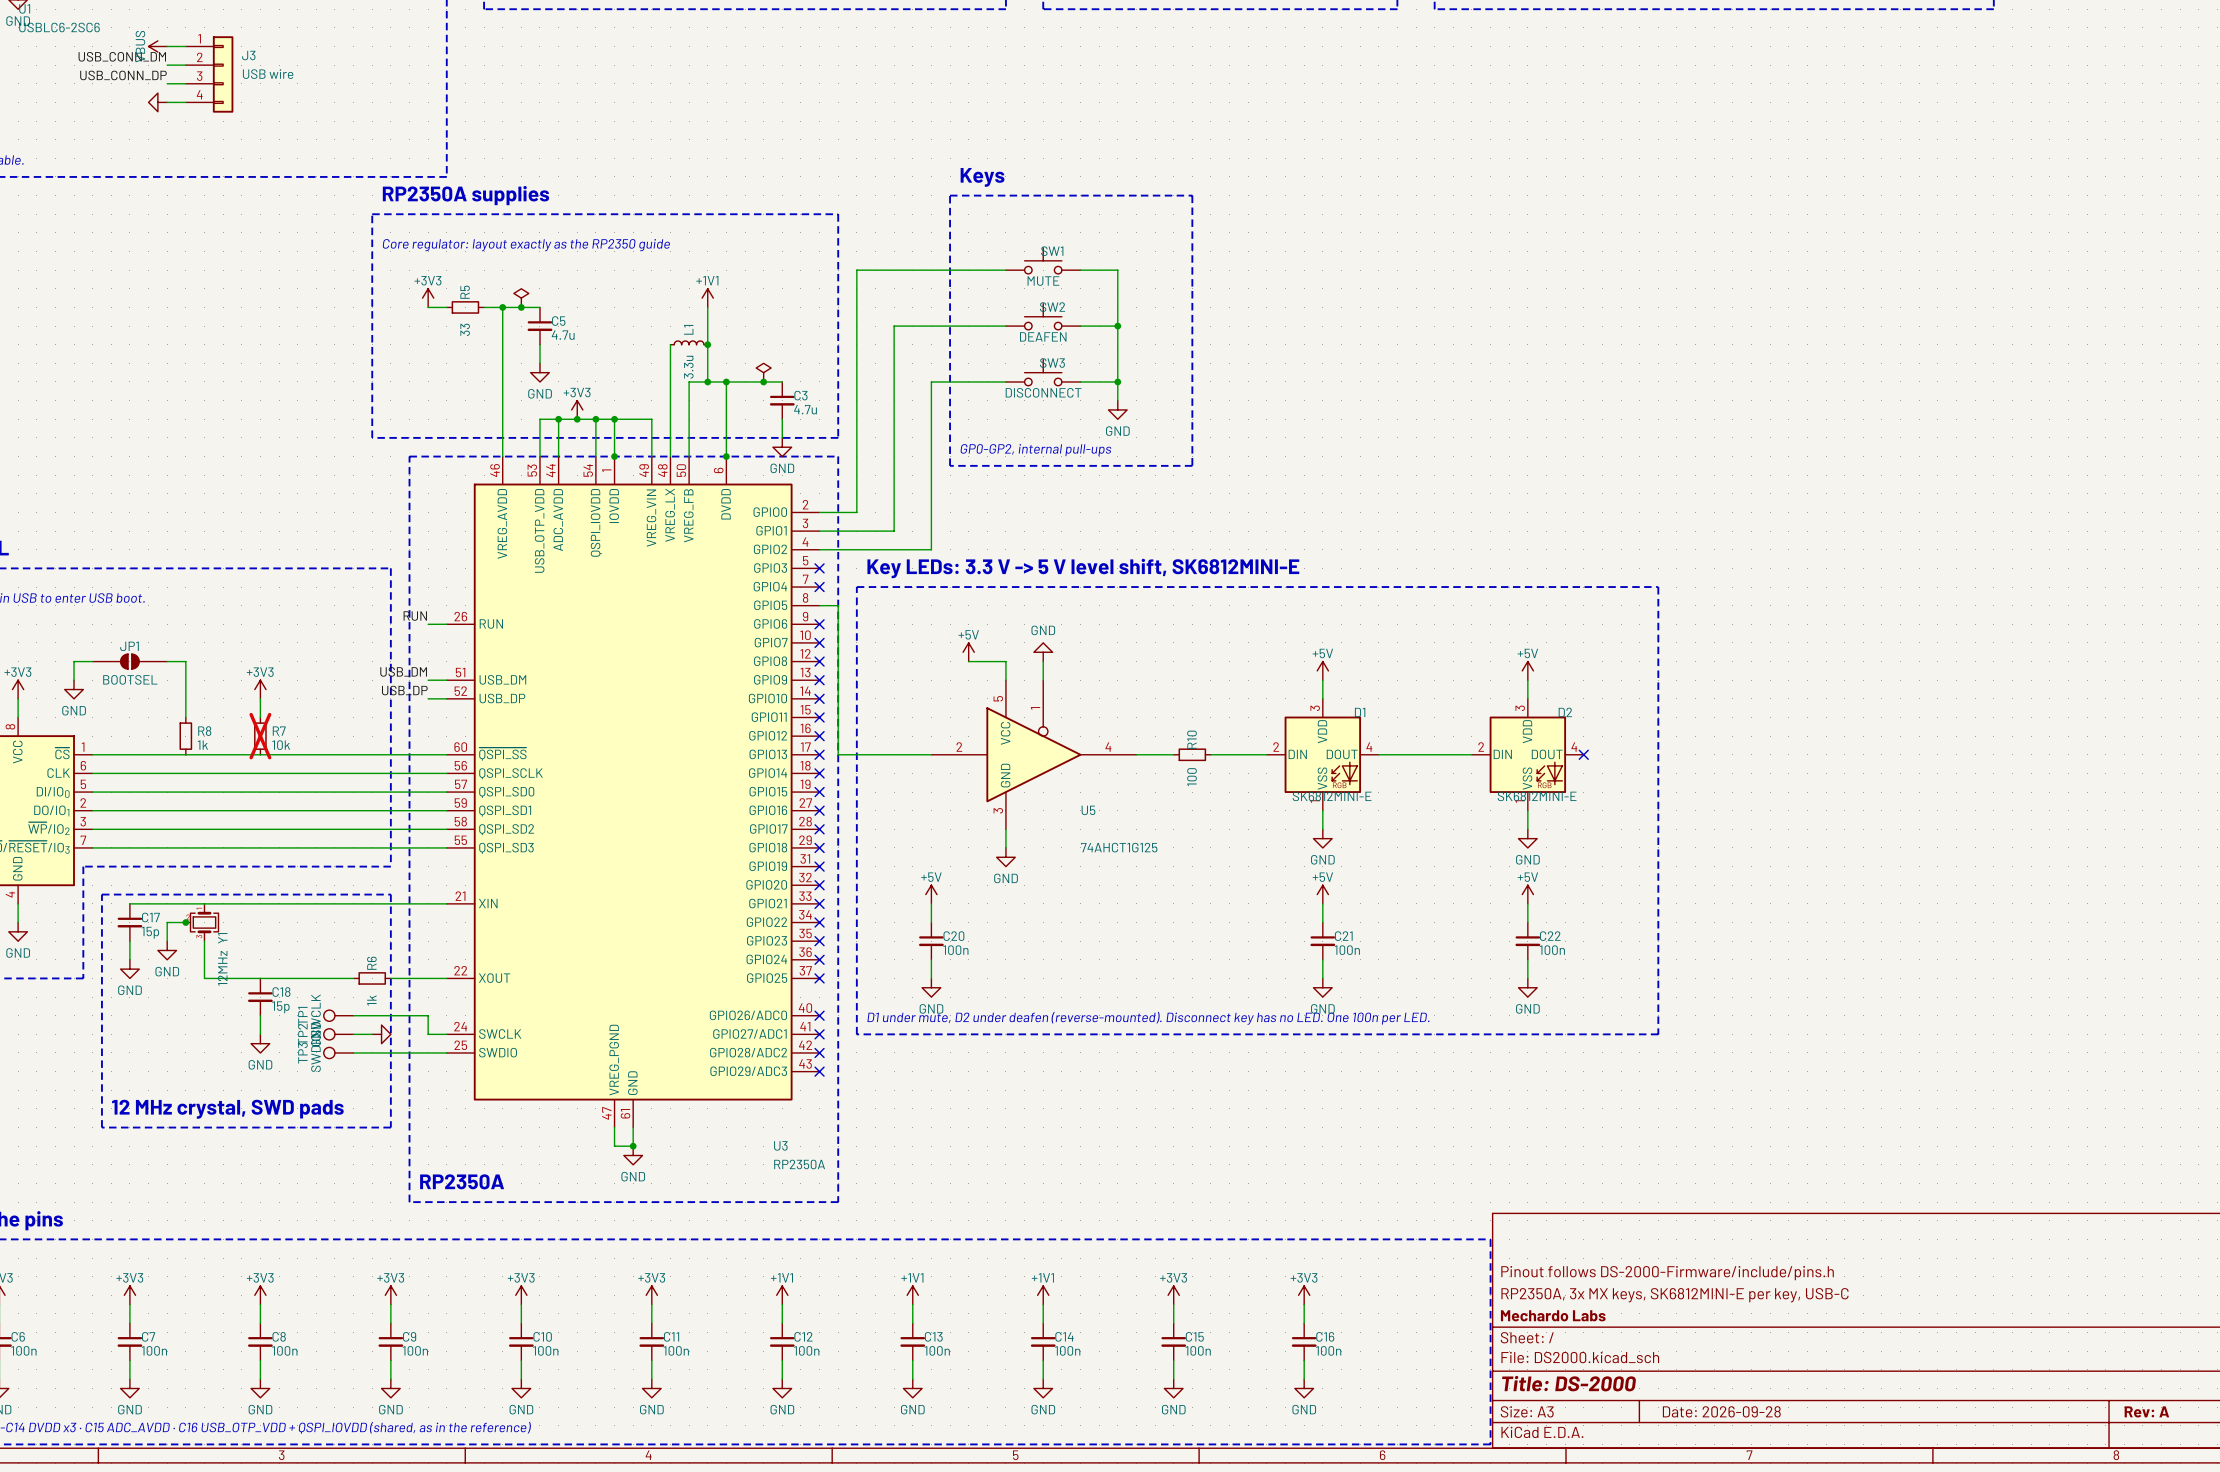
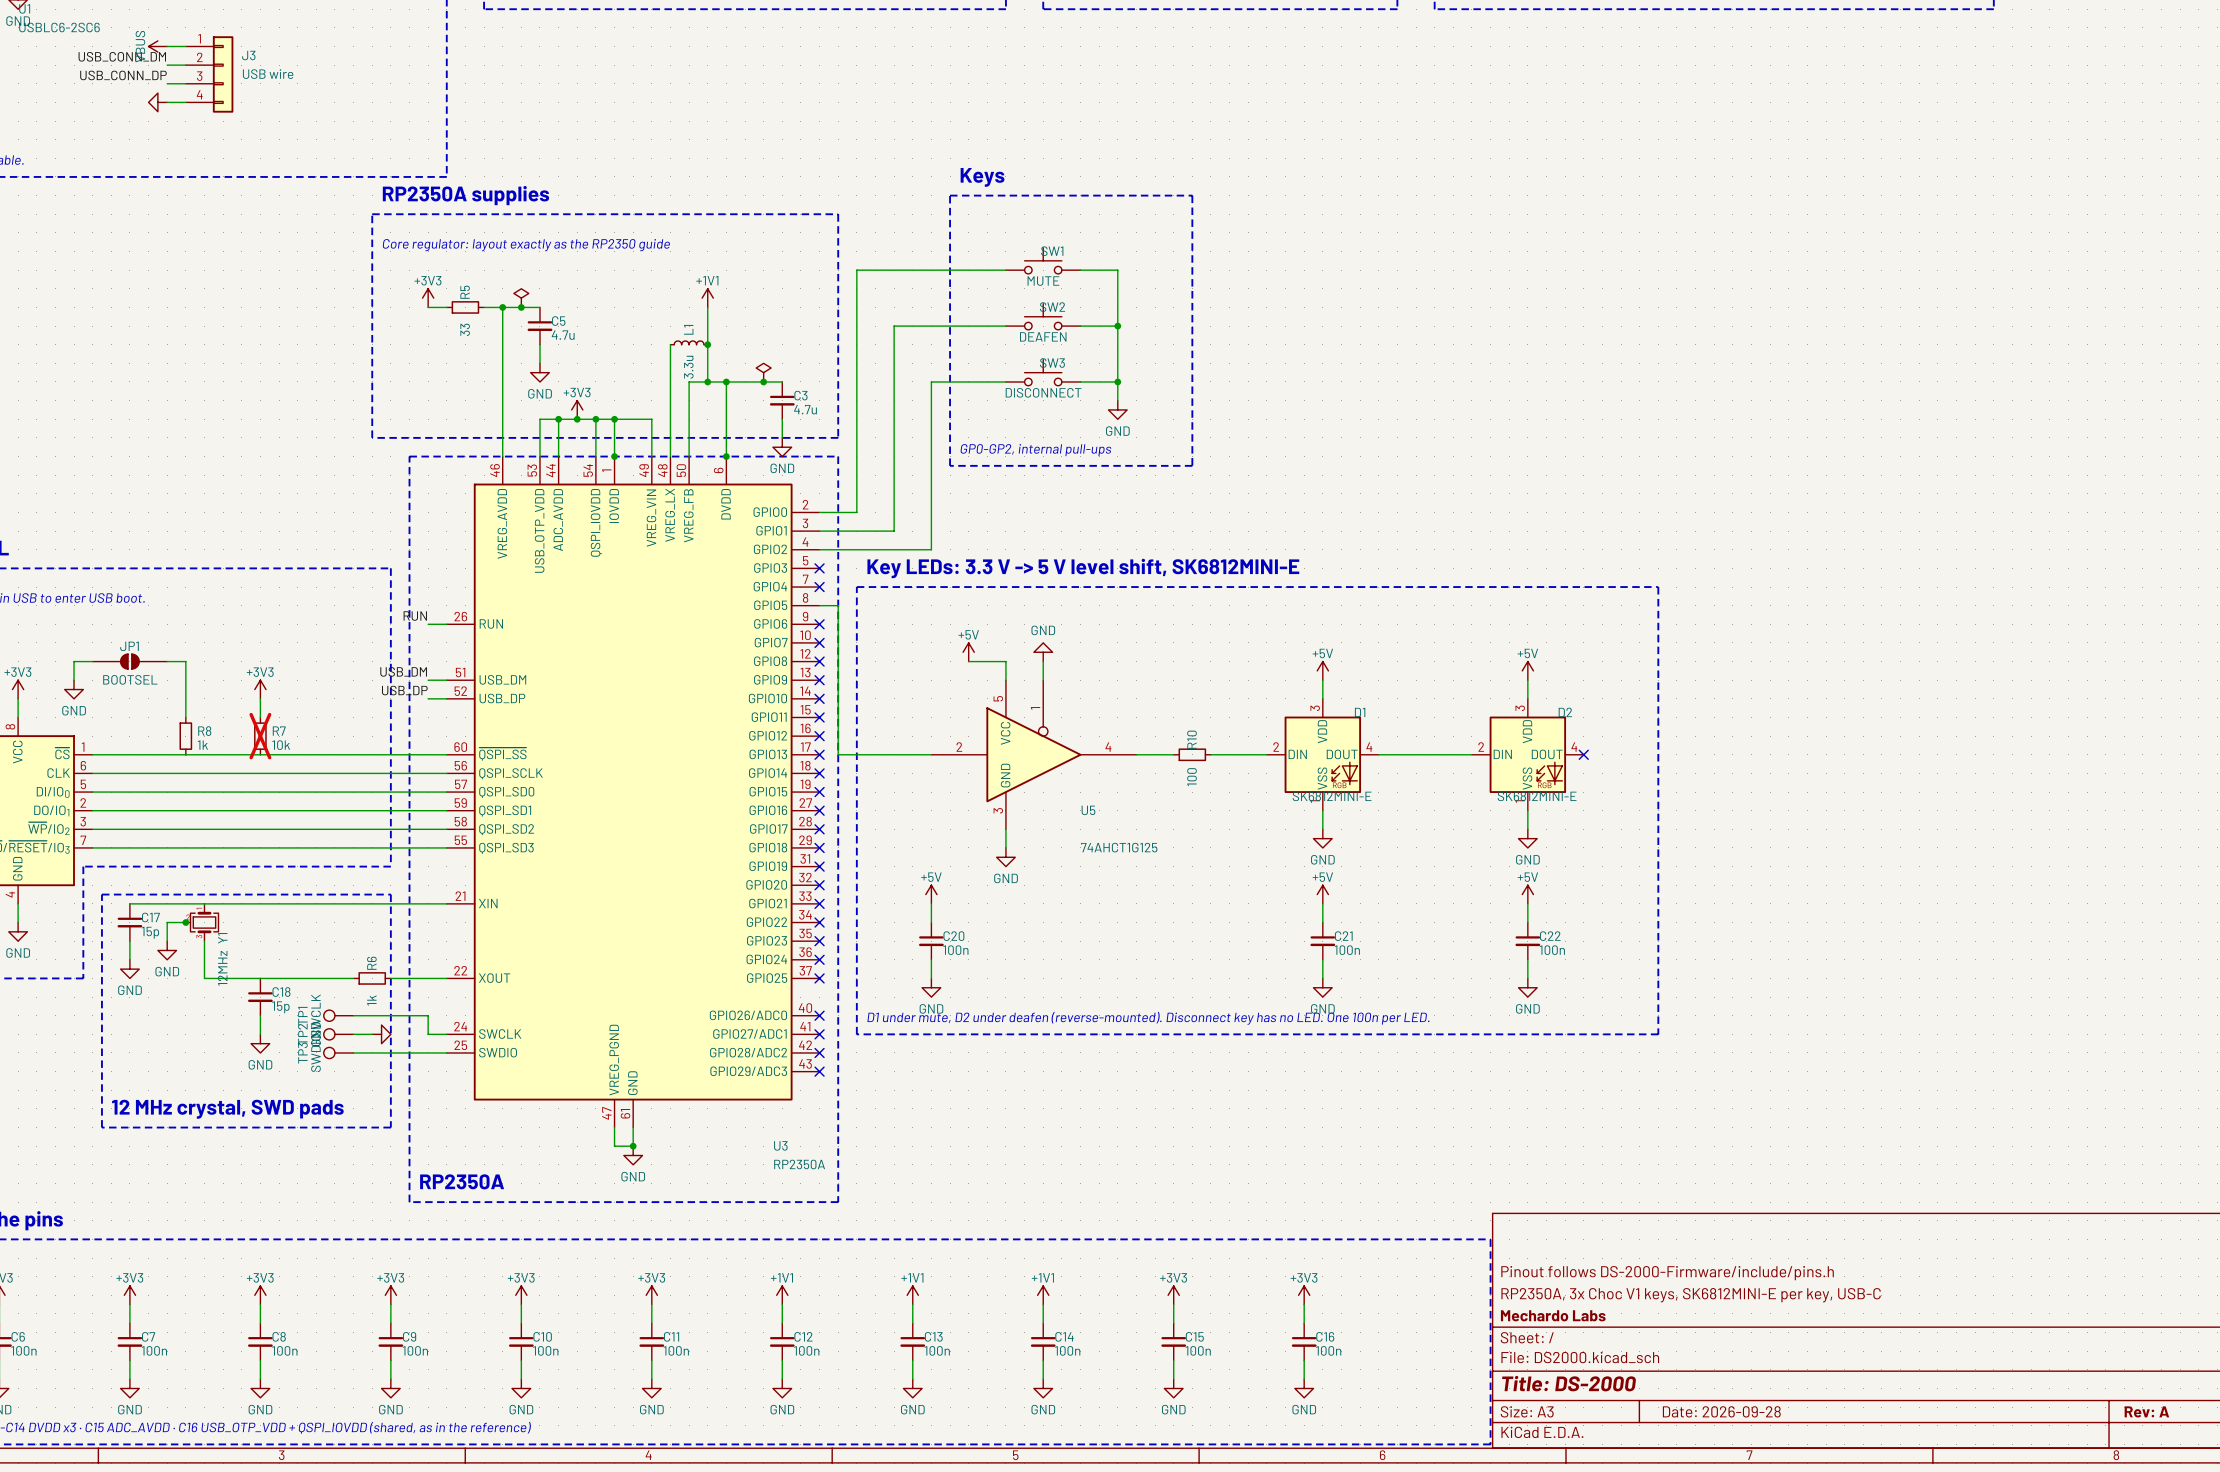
title block: RP2350A, 3x MX keys, SK6812MINI-E per key, USB-C (1675, 1295) -> RP2350A, 3x Choc V1 keys, SK6812MINI-E per key, USB-C (1691, 1295)

